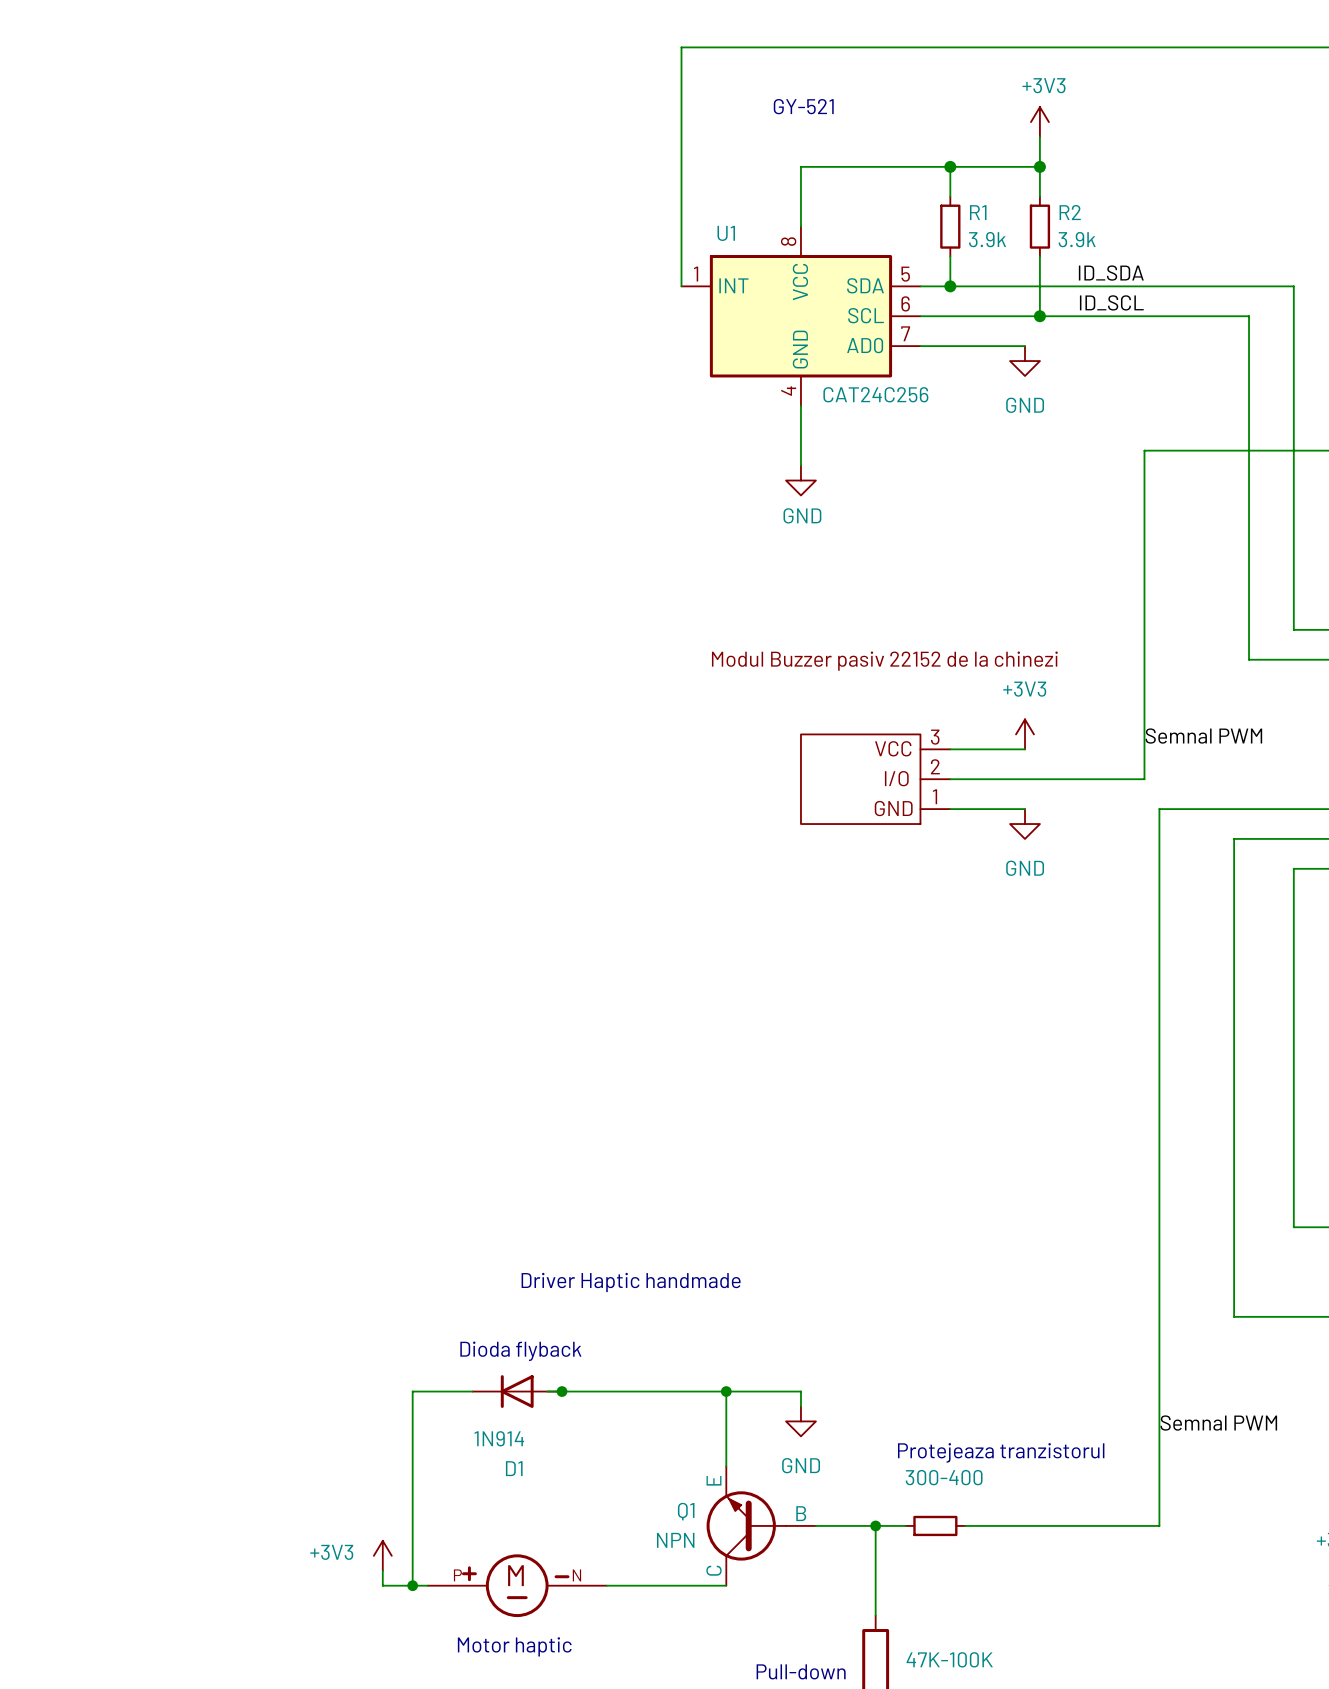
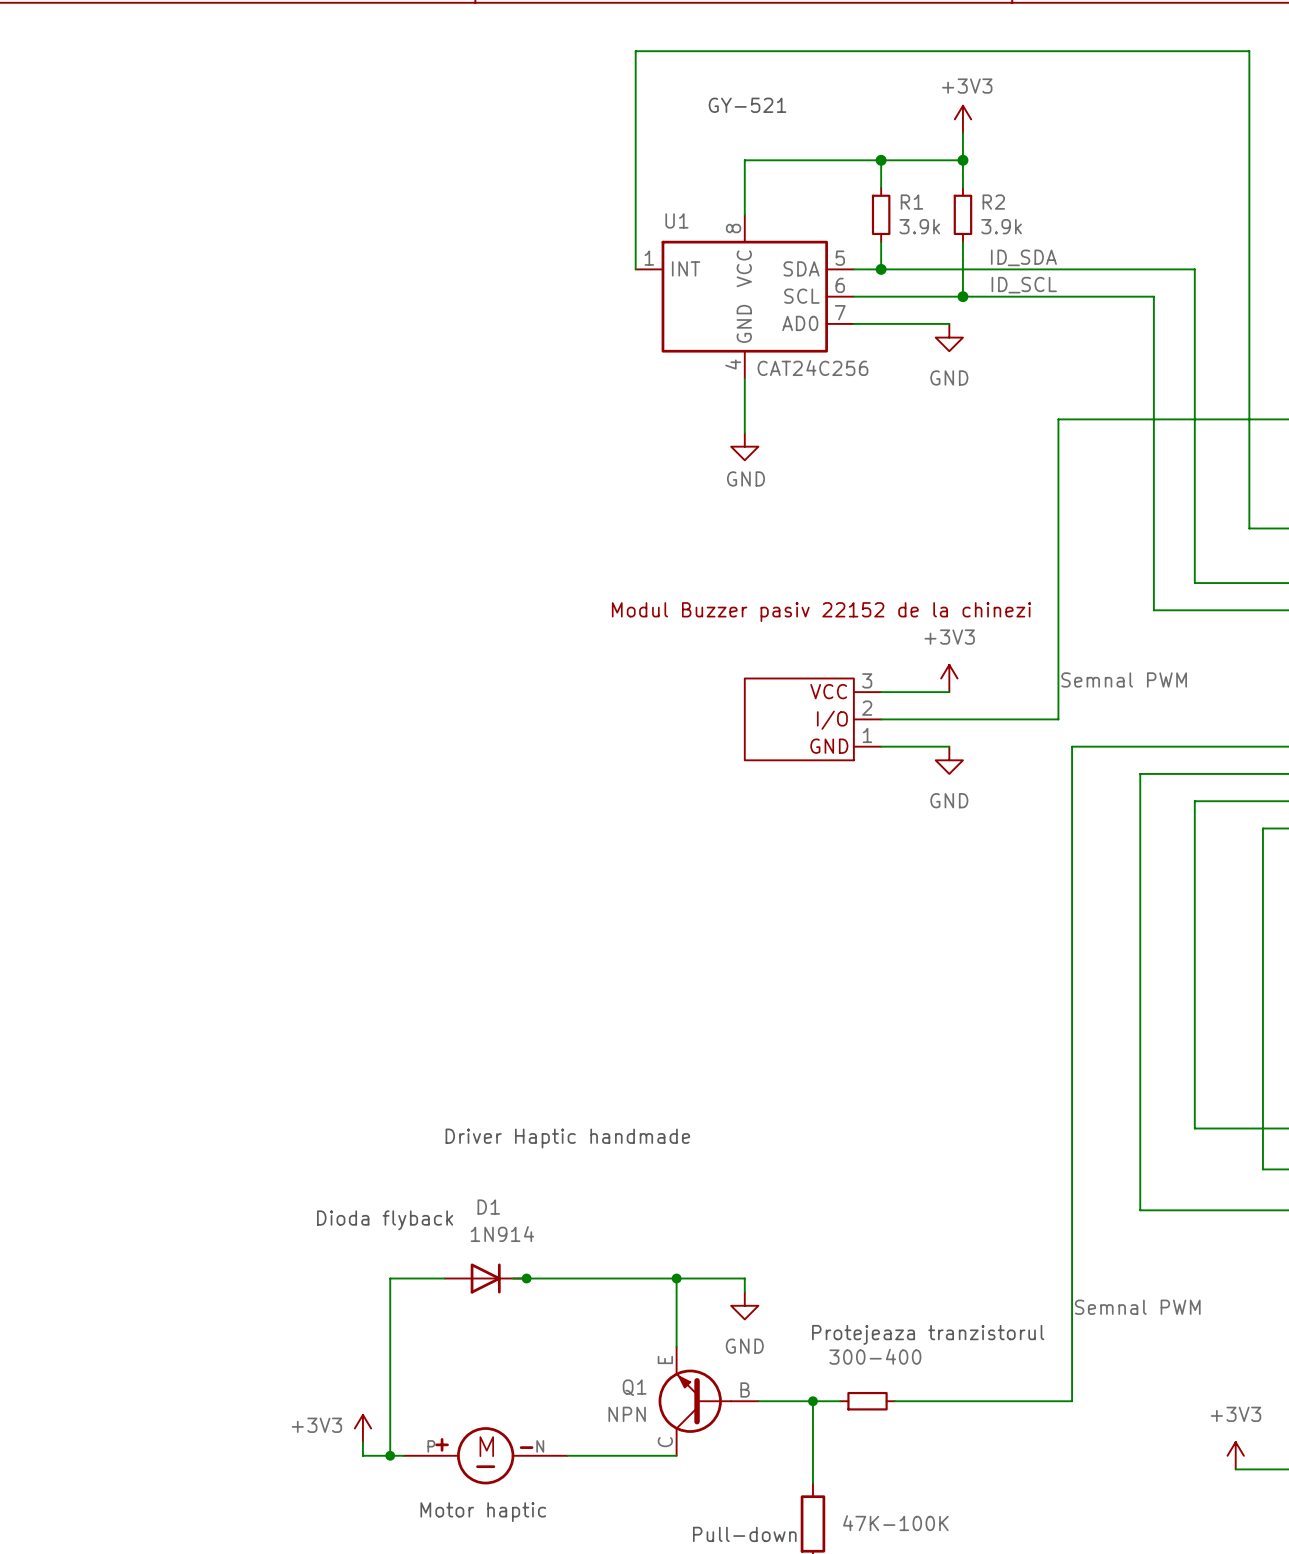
text position: Driver Haptic handmade (631, 1282) -> Driver Haptic handmade (567, 1138)
text position: Dioda flyback (520, 1351) -> Dioda flyback (385, 1220)
D1 rotation: 0° (517, 1391) -> 180° (485, 1278)

